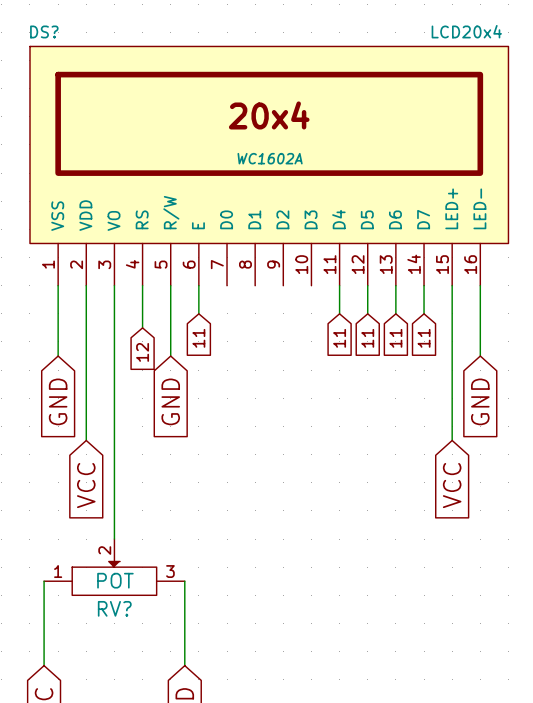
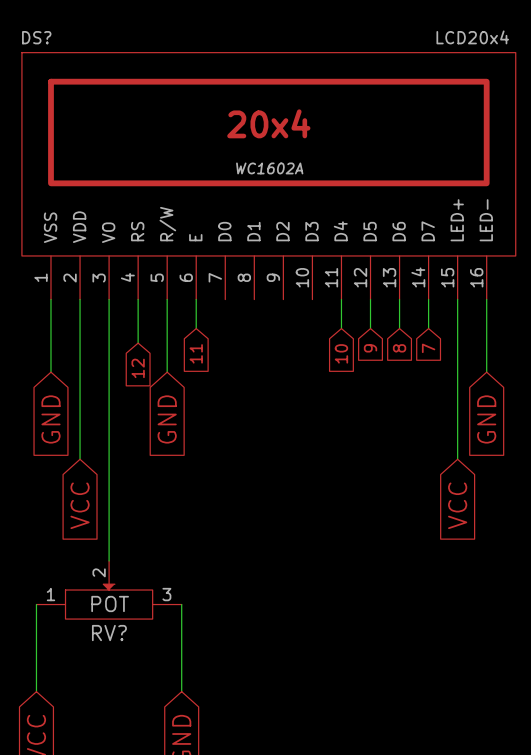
global label: 11 (339, 338) -> 10 (341, 353)
global label: 11 (367, 338) -> 9 (370, 348)
global label: 11 (395, 338) -> 8 (399, 348)
global label: 11 (424, 338) -> 7 (428, 348)

